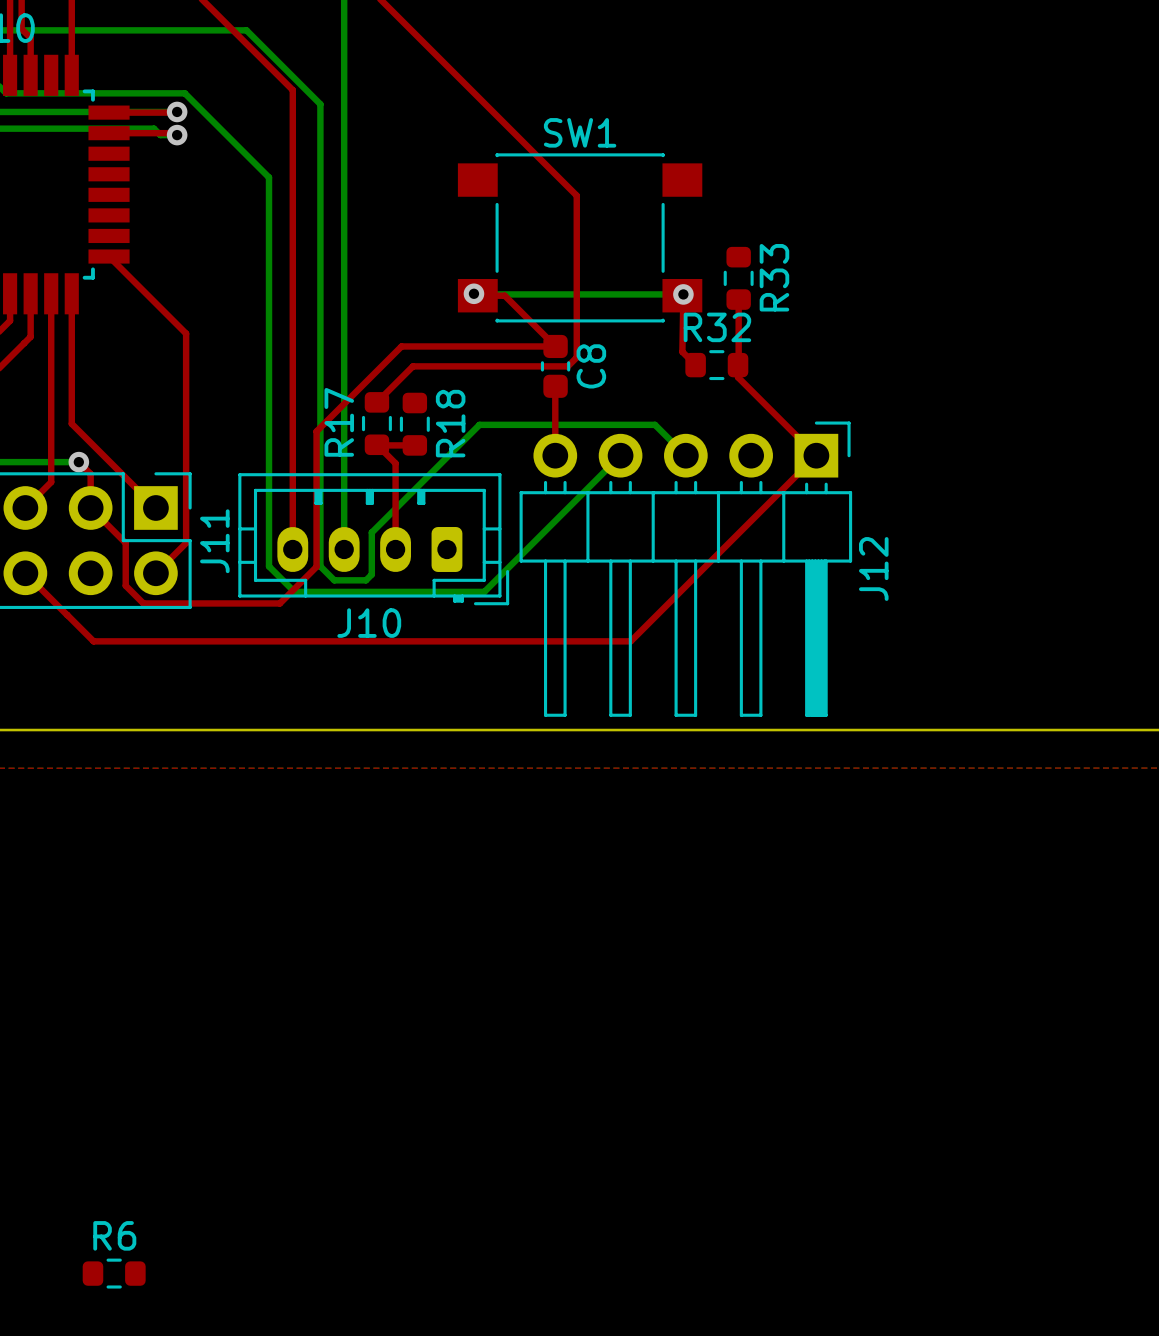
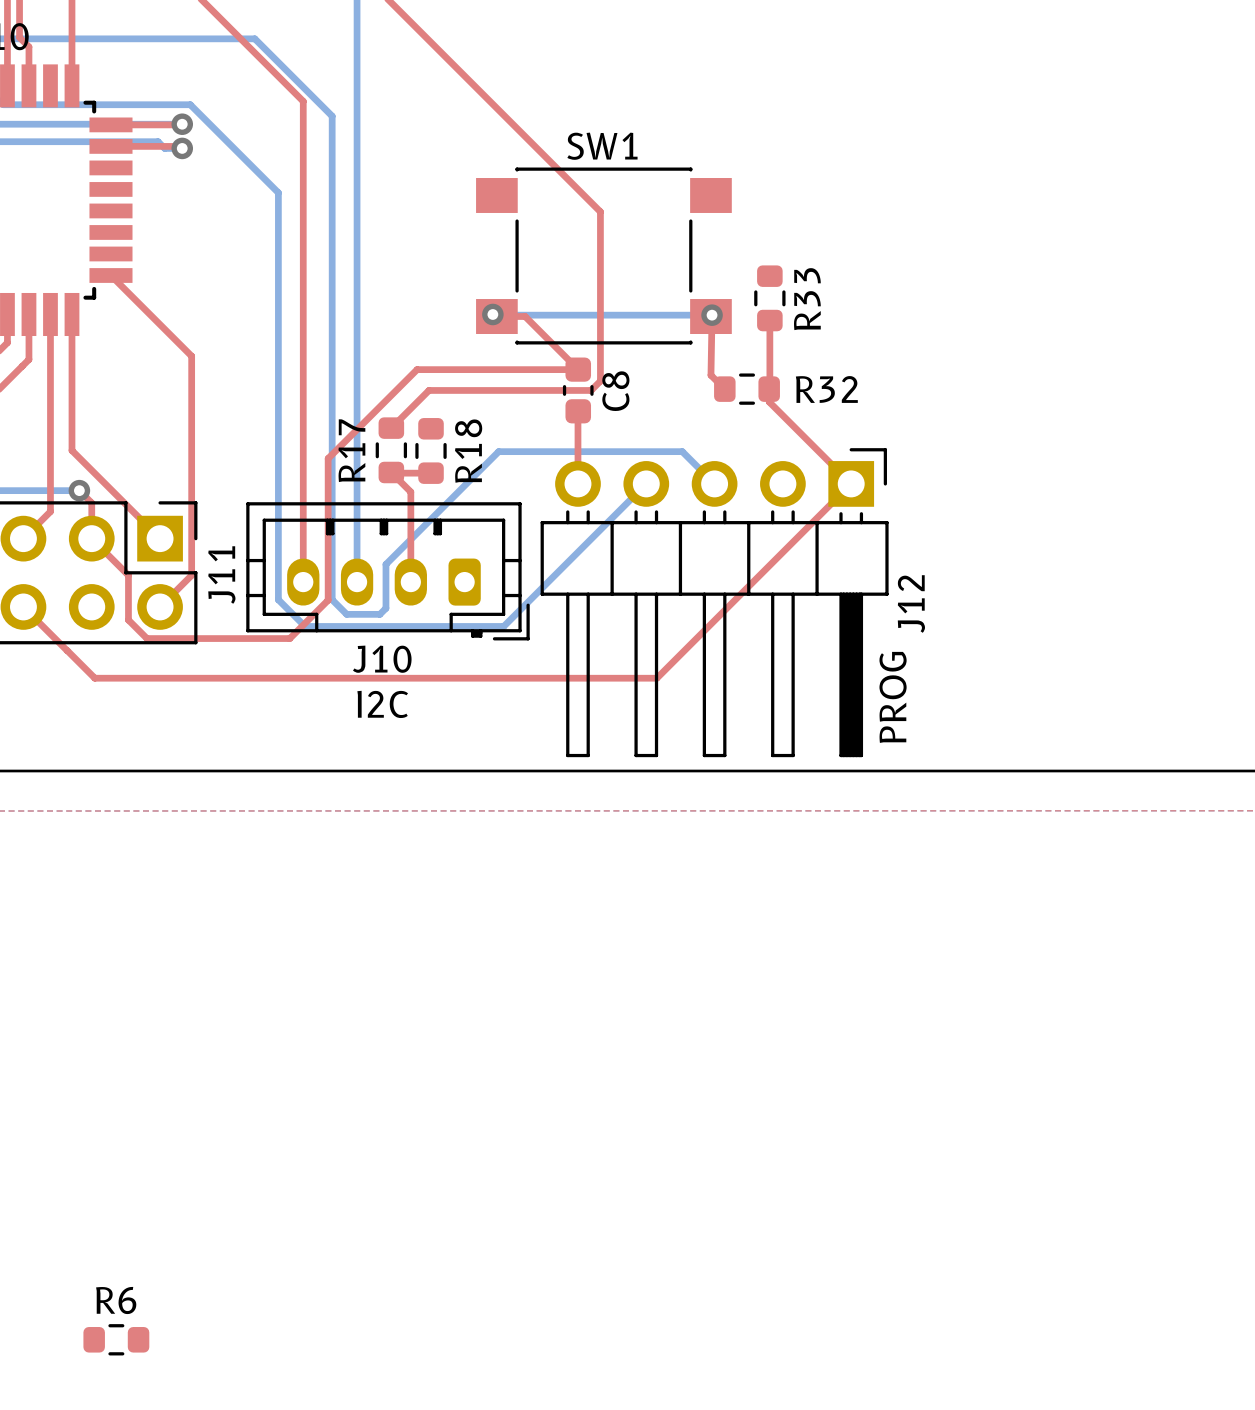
R32 name position: R32 (717, 327) -> R32 (826, 389)
text: none -> PROG (893, 697)
text: none -> I2C (382, 704)

